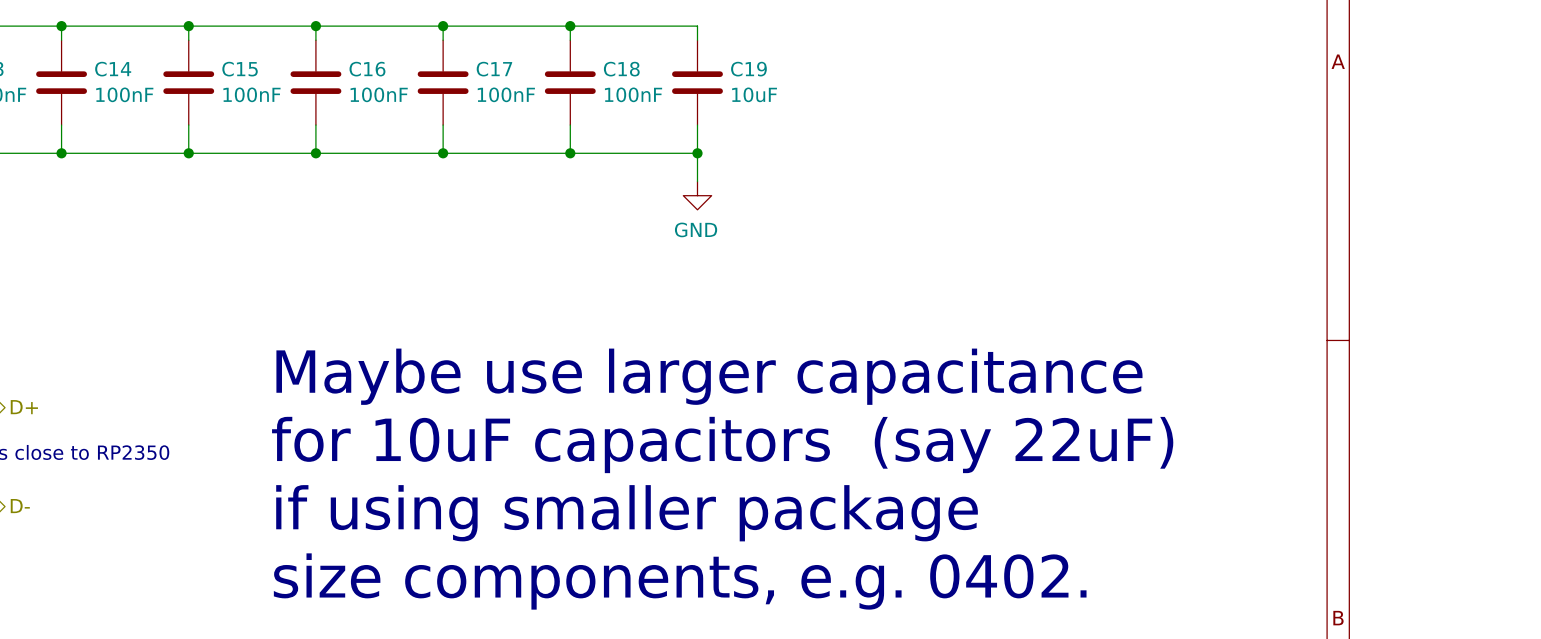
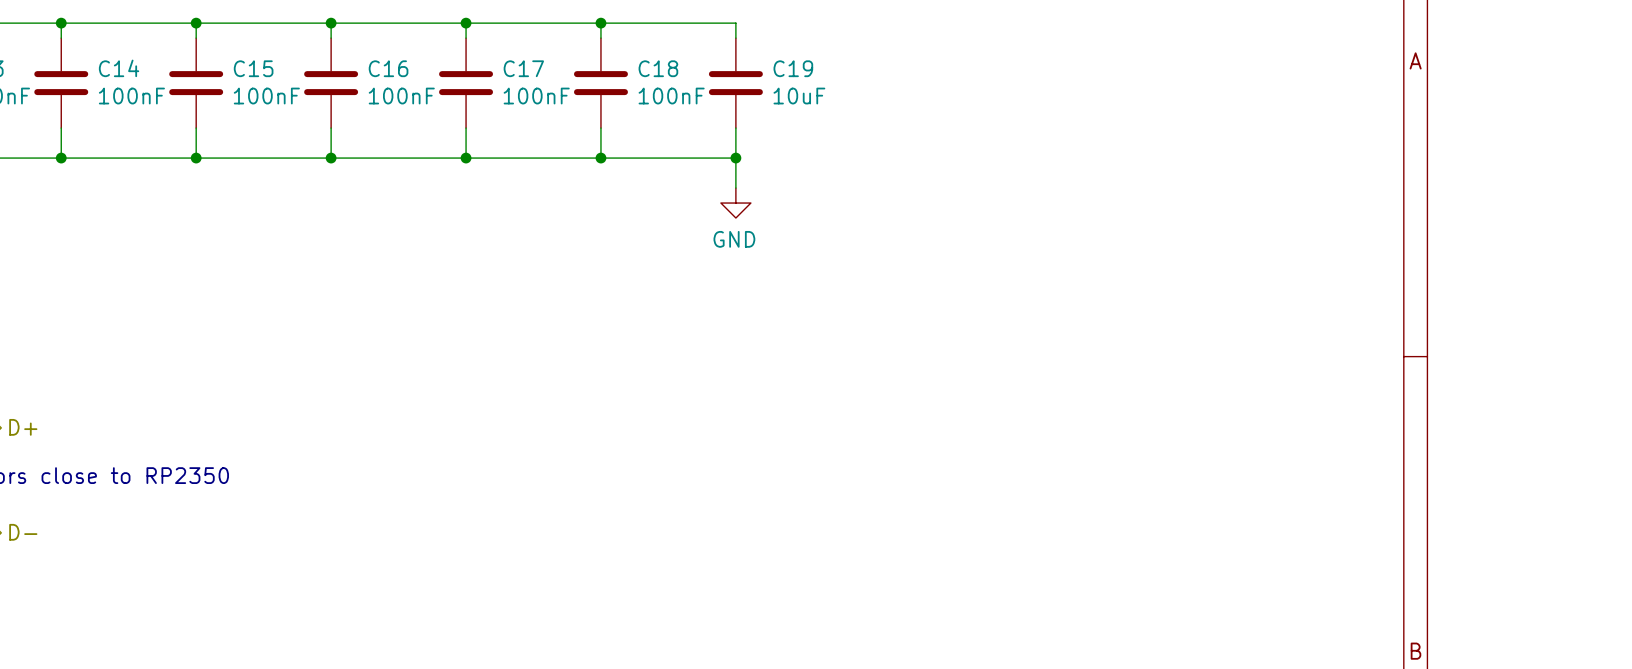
text: Maybe use larger capacitance (709, 376) -> none
text: for 10uF capacitors (say 22uF) (722, 444) -> none
text: if using smaller package (627, 513) -> none
text: size components, e.g. 0402. (680, 581) -> none

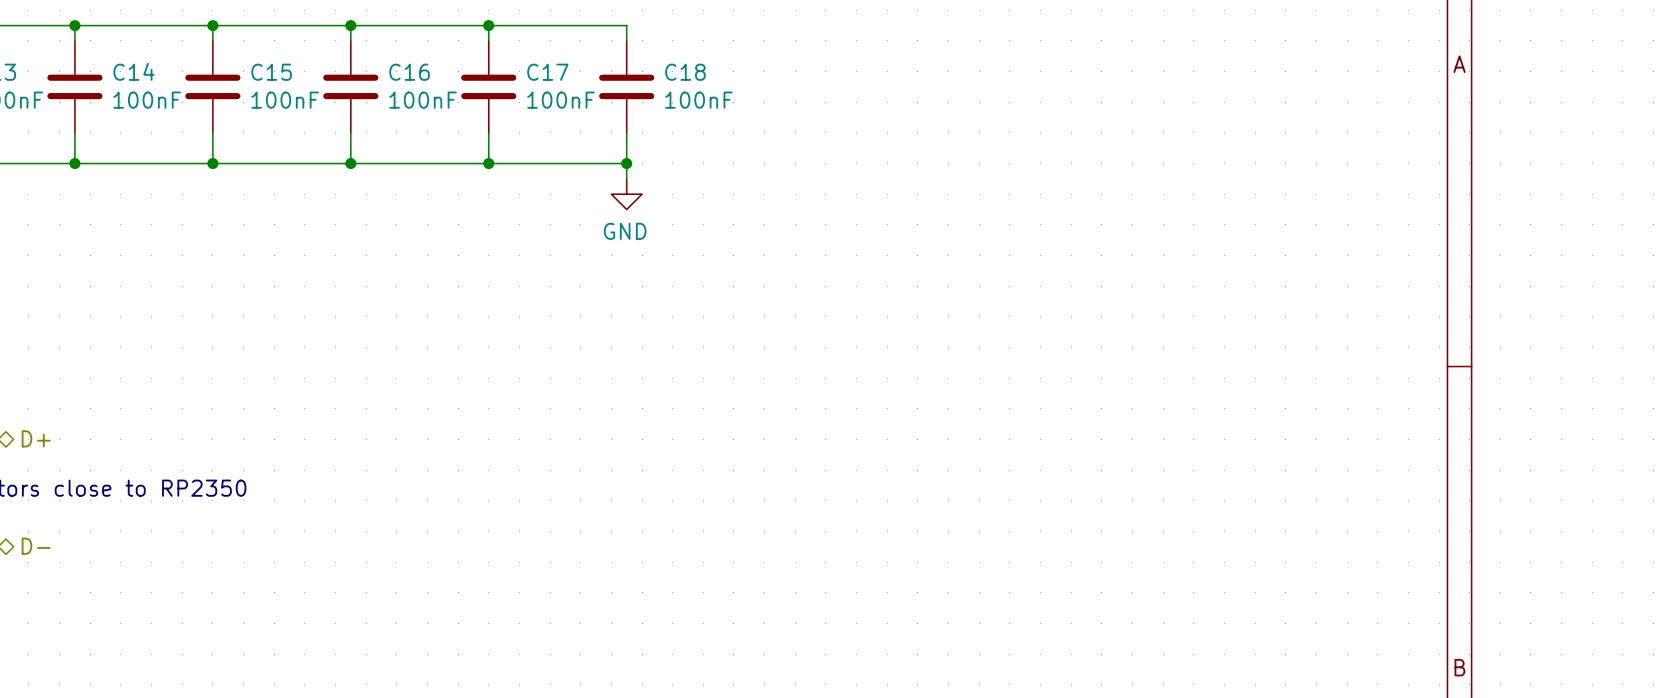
wire: (600, 23) (735, 23) (735, 38) -> none
junction: (600, 23) -> none
C19: 10uF (735, 83) -> none
wire: (735, 128) (735, 188) -> none
wire: (600, 158) (735, 158) -> (626, 163) (626, 178)
junction: (735, 158) -> none
power symbol position: GND (735, 203) -> GND (626, 194)

